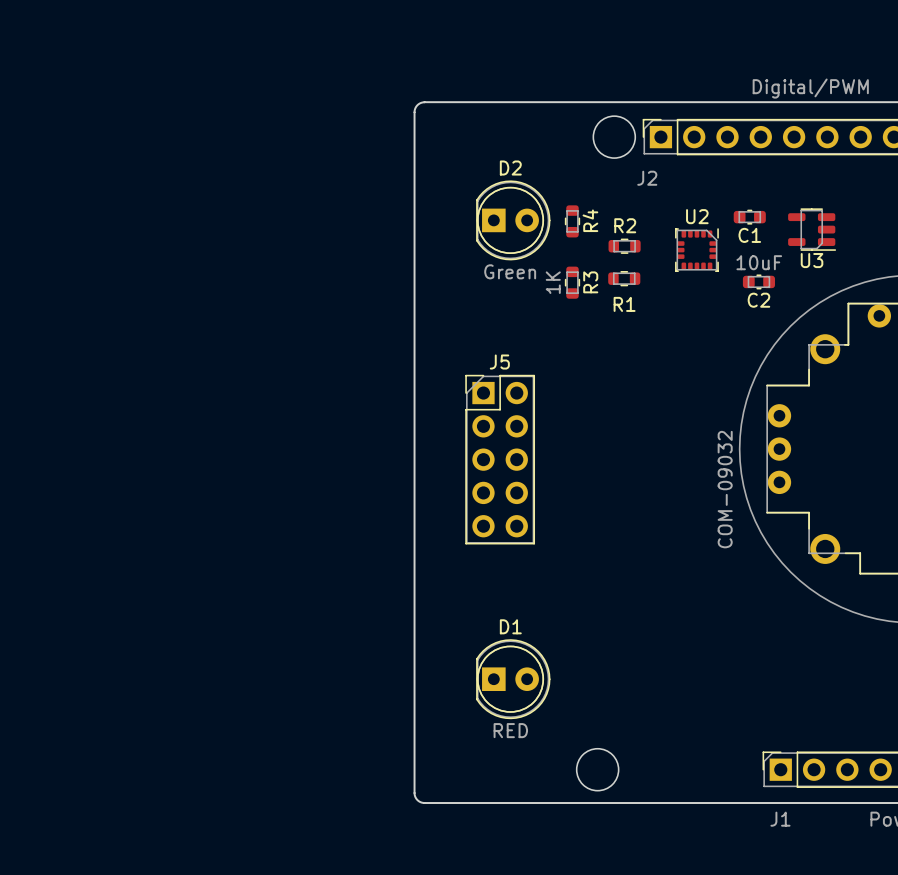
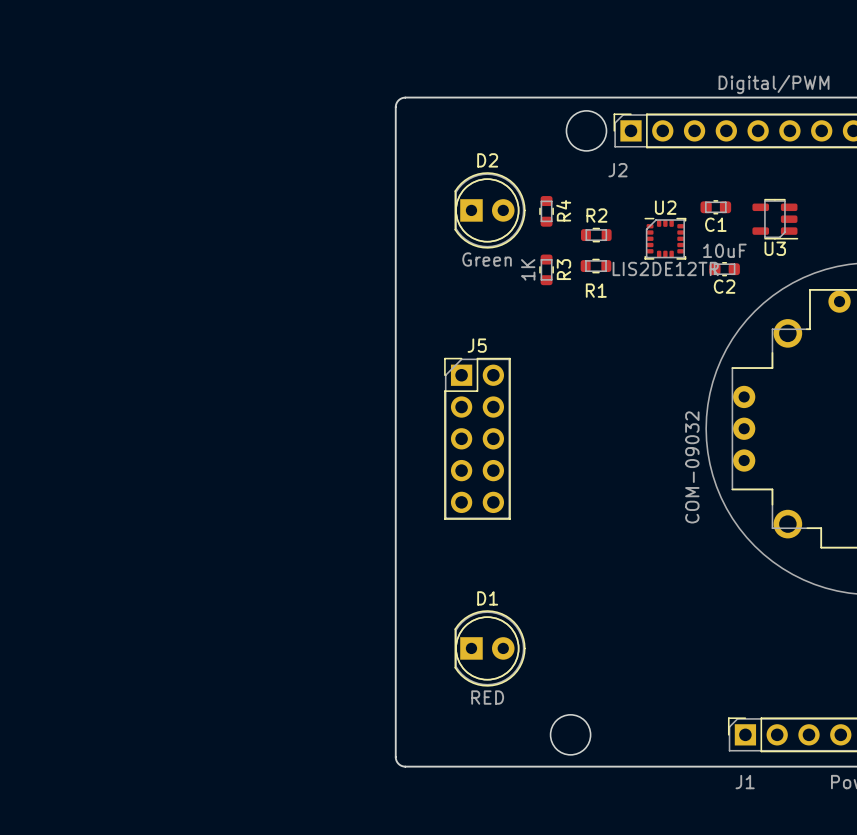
U2 rotation: 0° (696, 250) -> 90° counterclockwise (665, 238)
U2 value: none -> LIS2DE12TR (665, 268)

